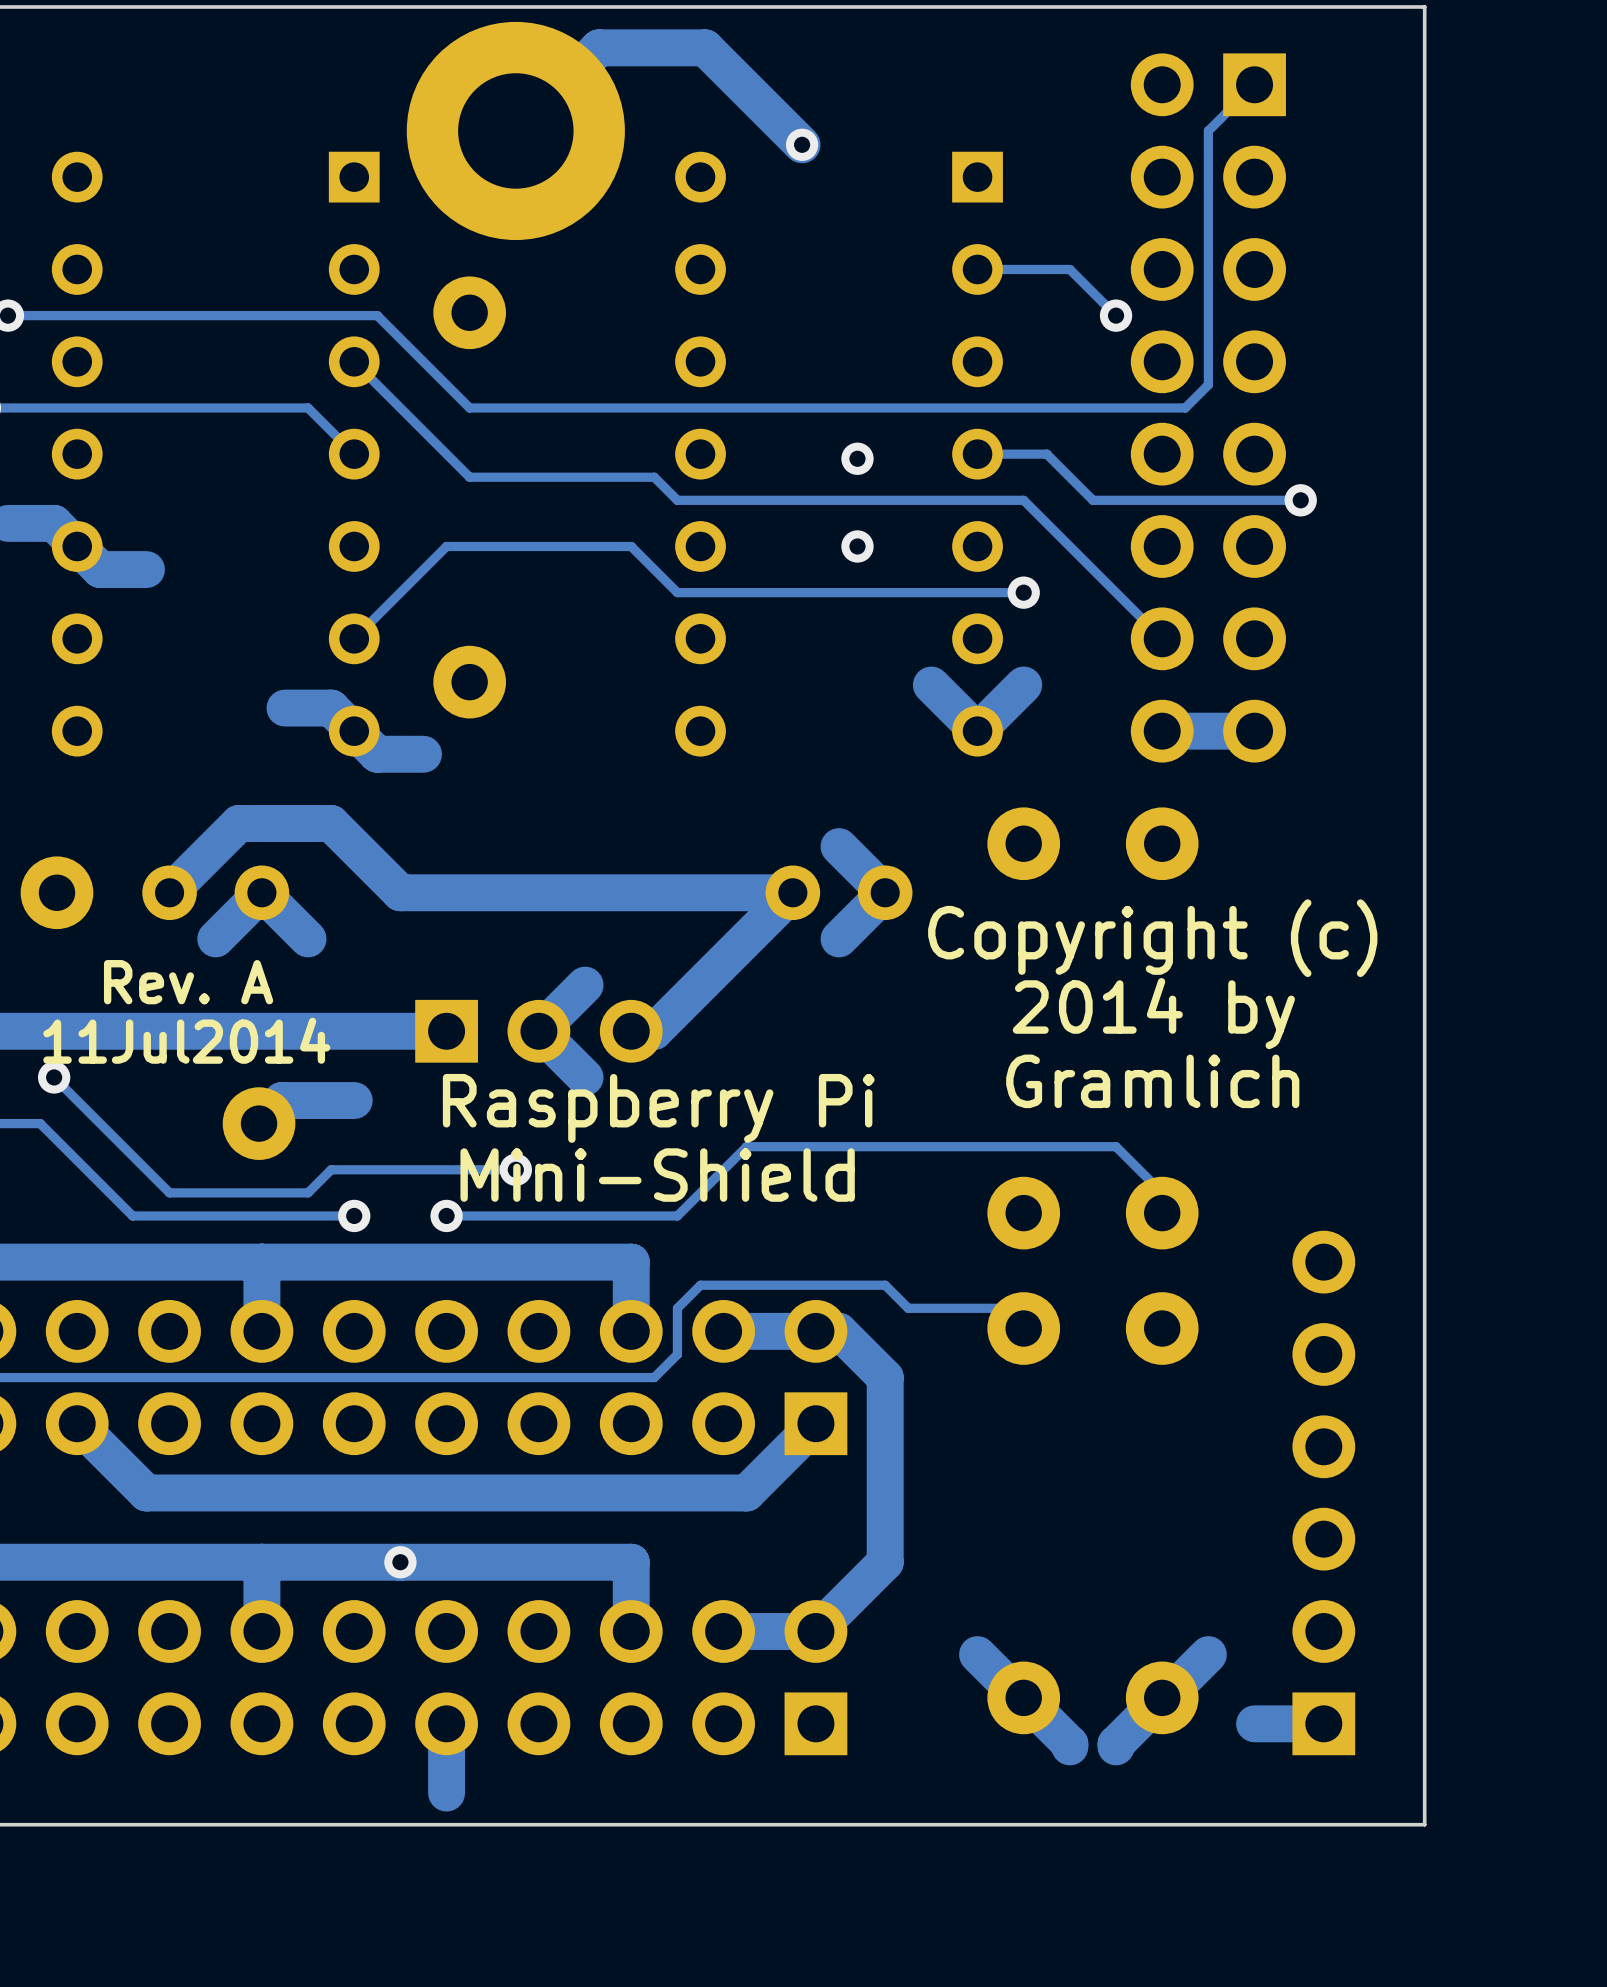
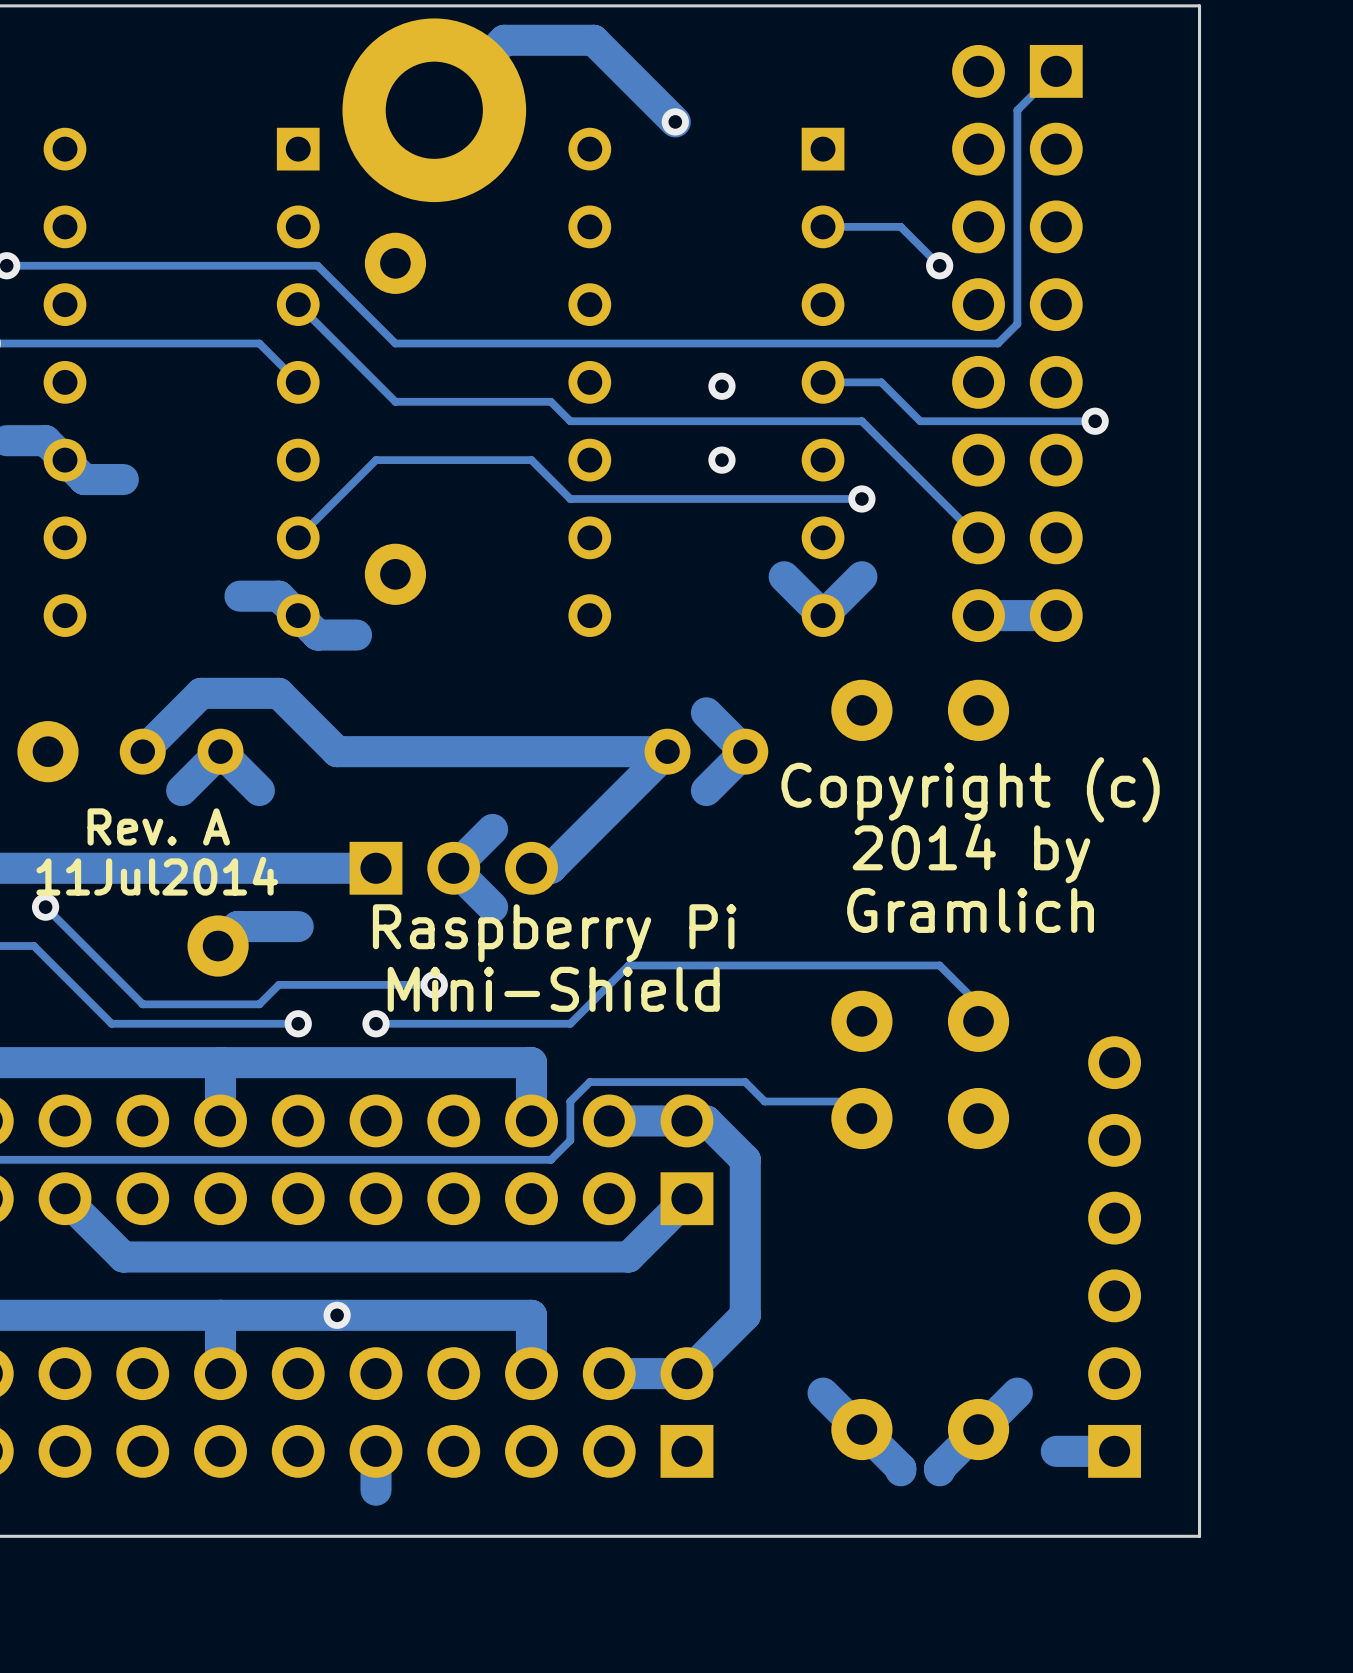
track: (446, 1770) (446, 1793) -> none

